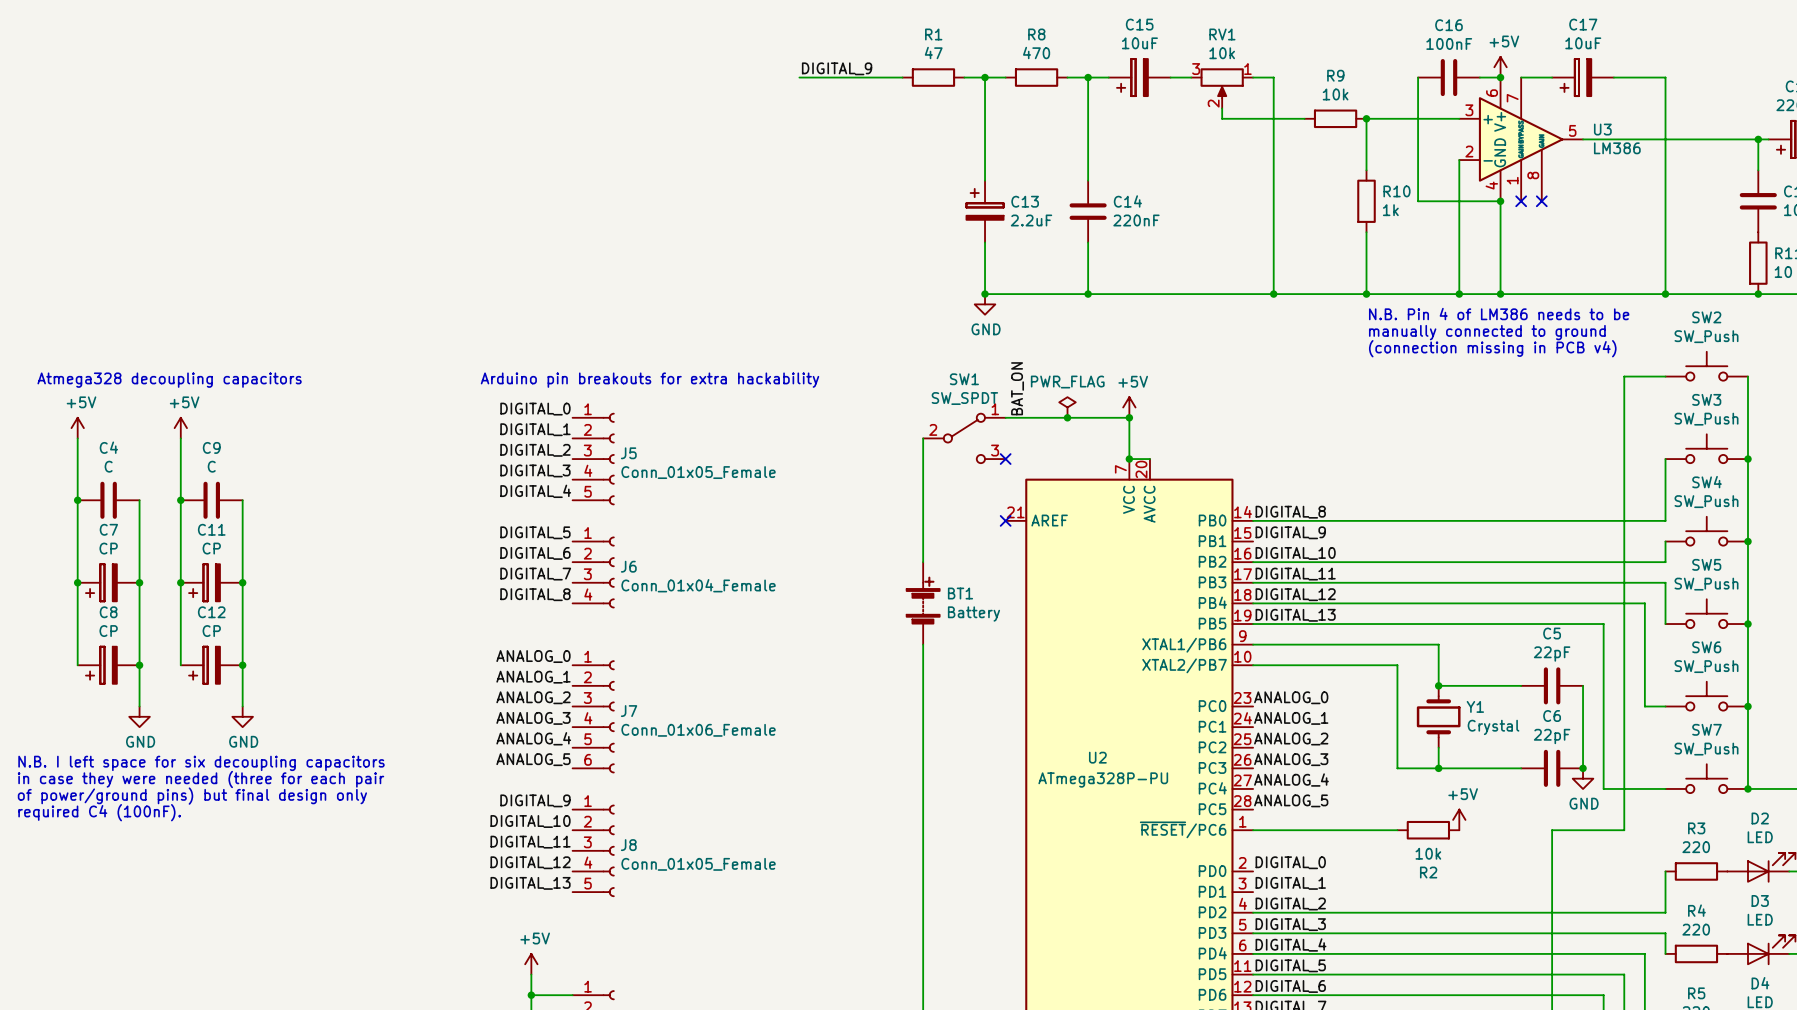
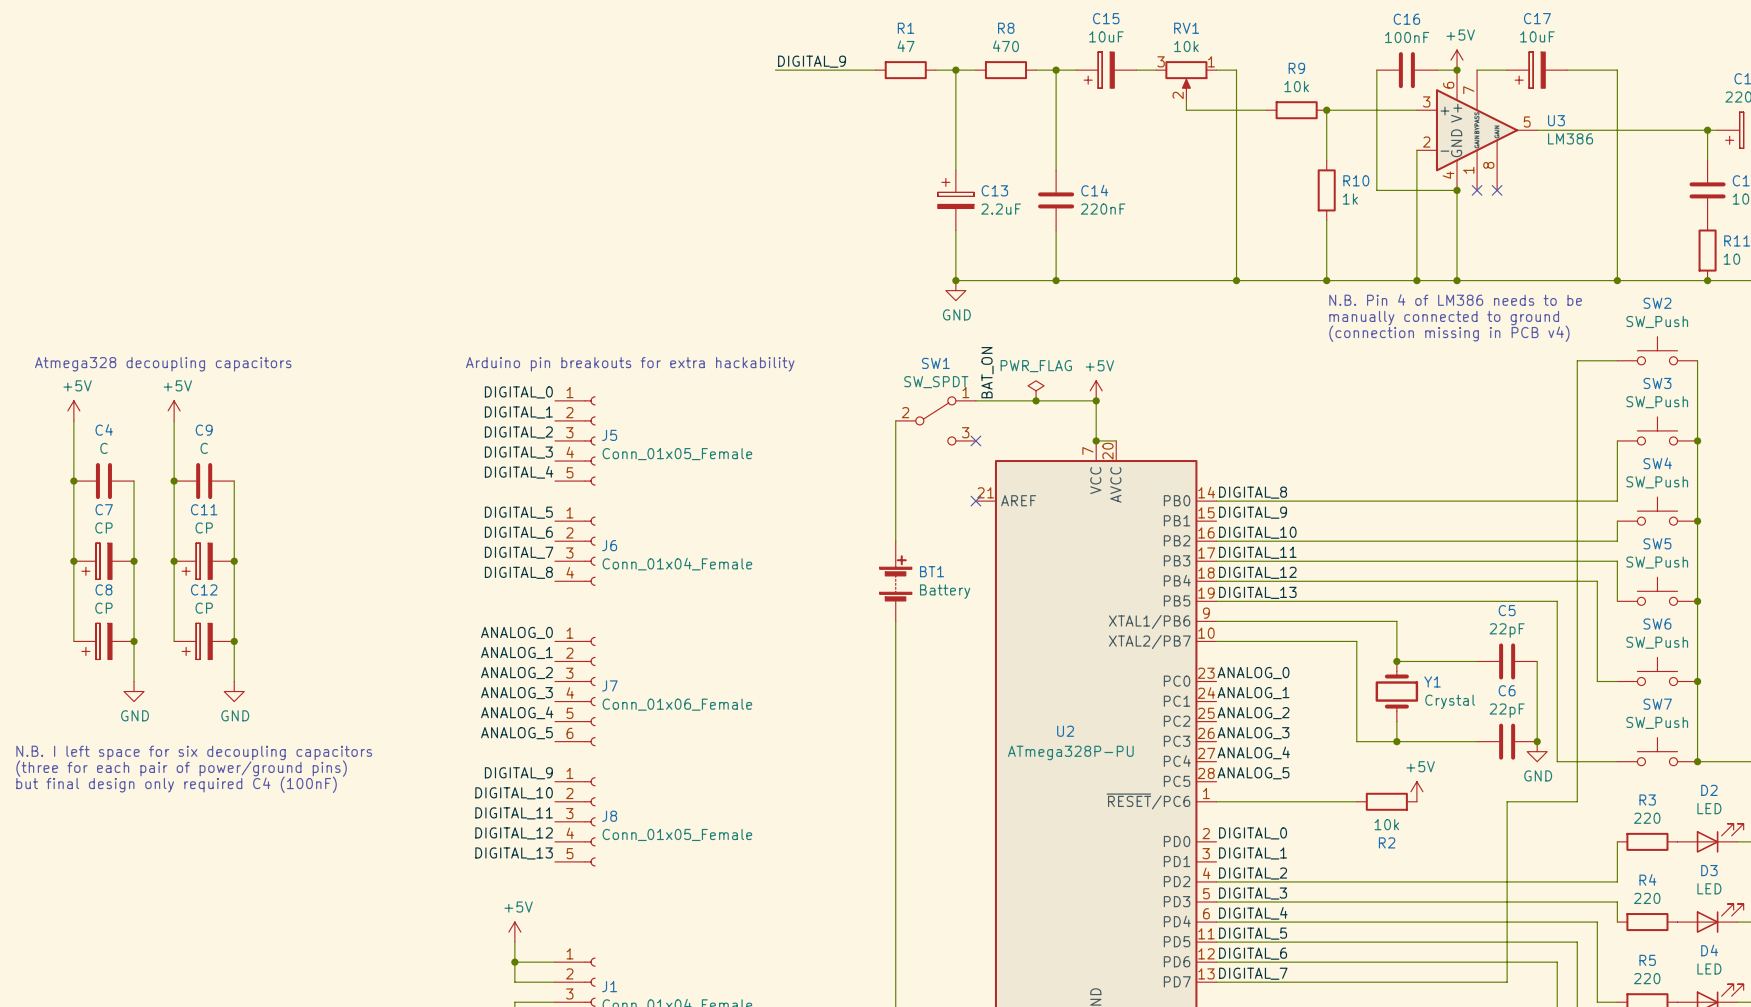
text: N.B. I left space for six decoupling capacitors (201, 763) -> none
text: in case they were needed (three for each pair (201, 779) -> N.B. I left space for six decoupling capacitors (194, 752)
text: of power/ground pins) but final design only (192, 796) -> (three for each pair of power/ground pins) (181, 768)
text: required C4 (100nF). (99, 812) -> but final design only required C4 (100nF) (176, 784)

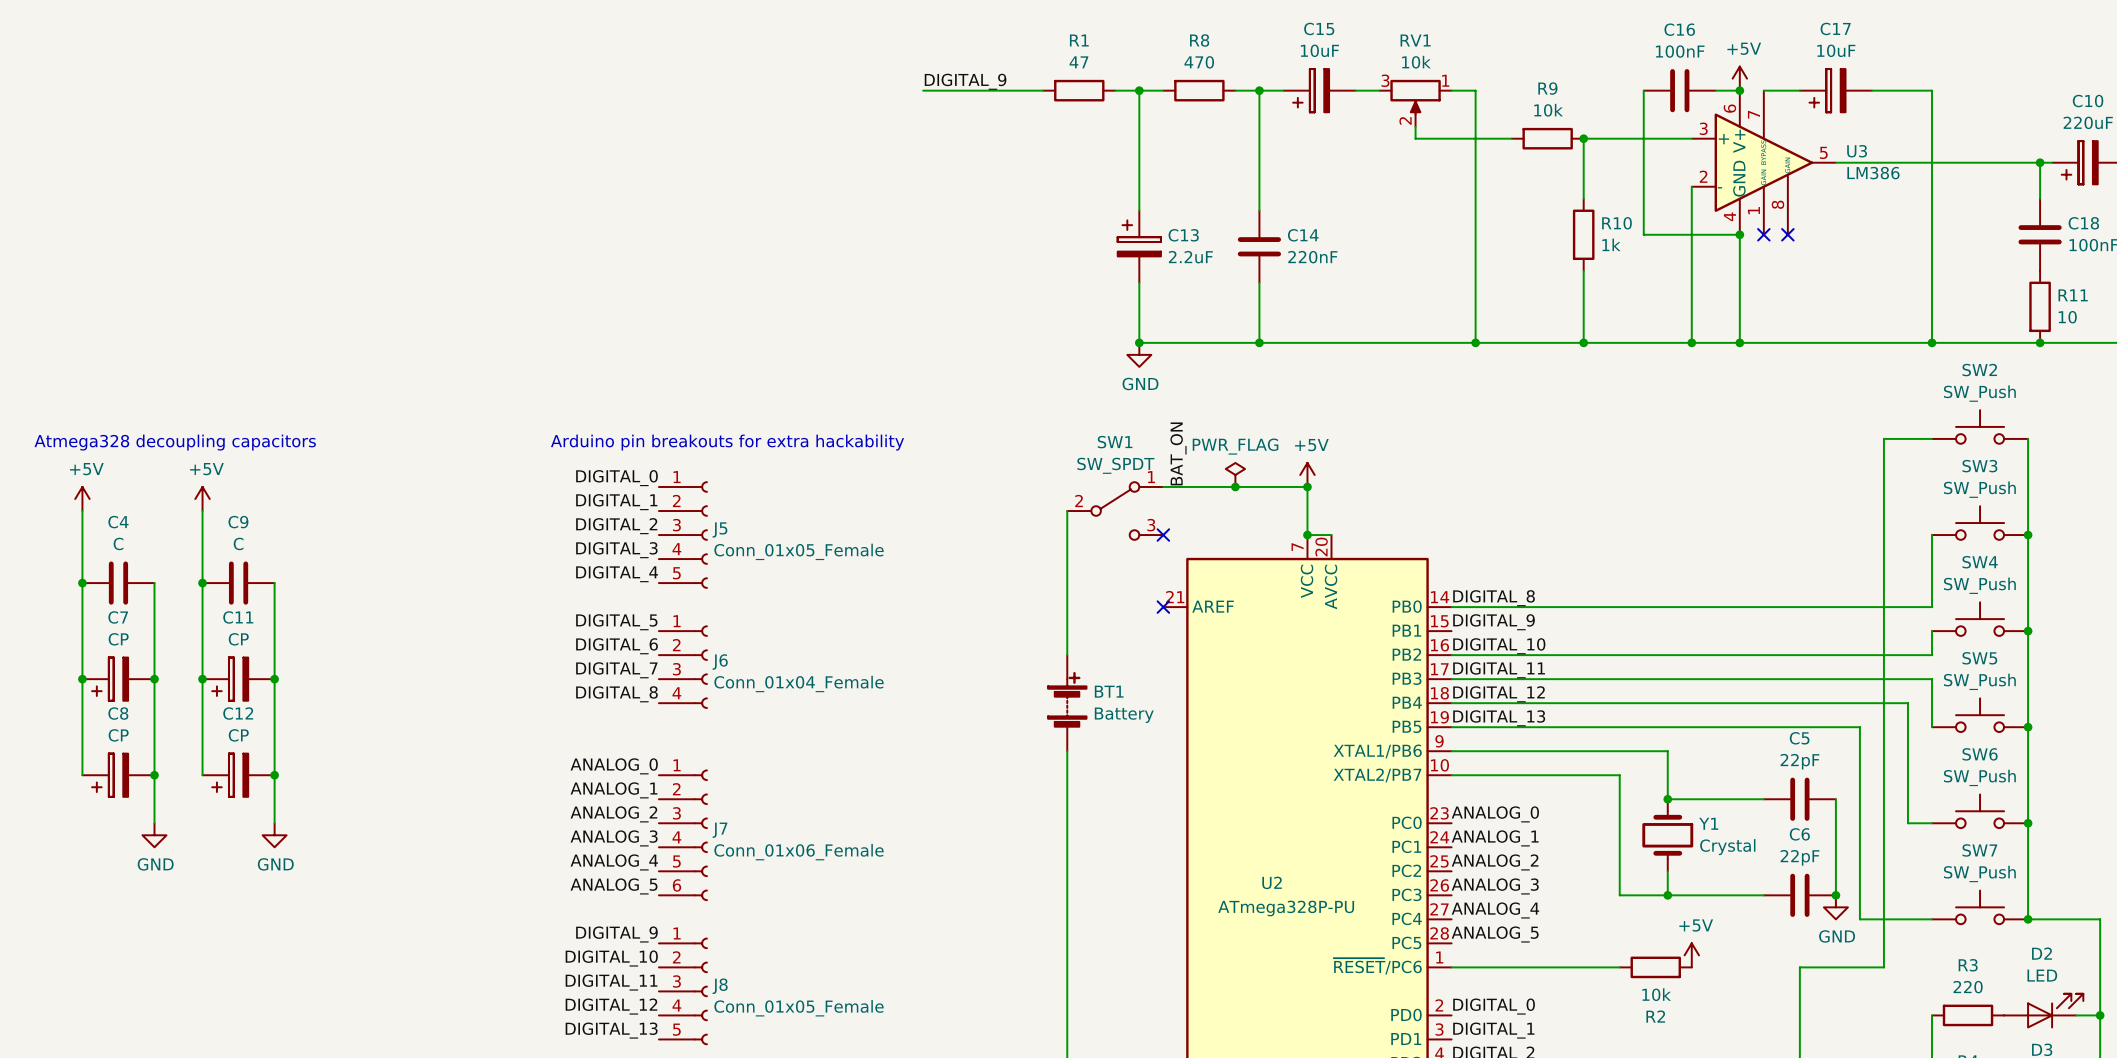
text: N.B. Pin 4 of LM386 needs to be (1455, 300) -> none
text: manually connected to ground (1444, 318) -> none
text: (connection missing in PCB v4) (1449, 333) -> none
text: N.B. I left space for six decoupling capacitors (194, 752) -> none
text: (three for each pair of power/ground pins) (181, 768) -> none
text: but final design only required C4 (100nF) (176, 784) -> none

